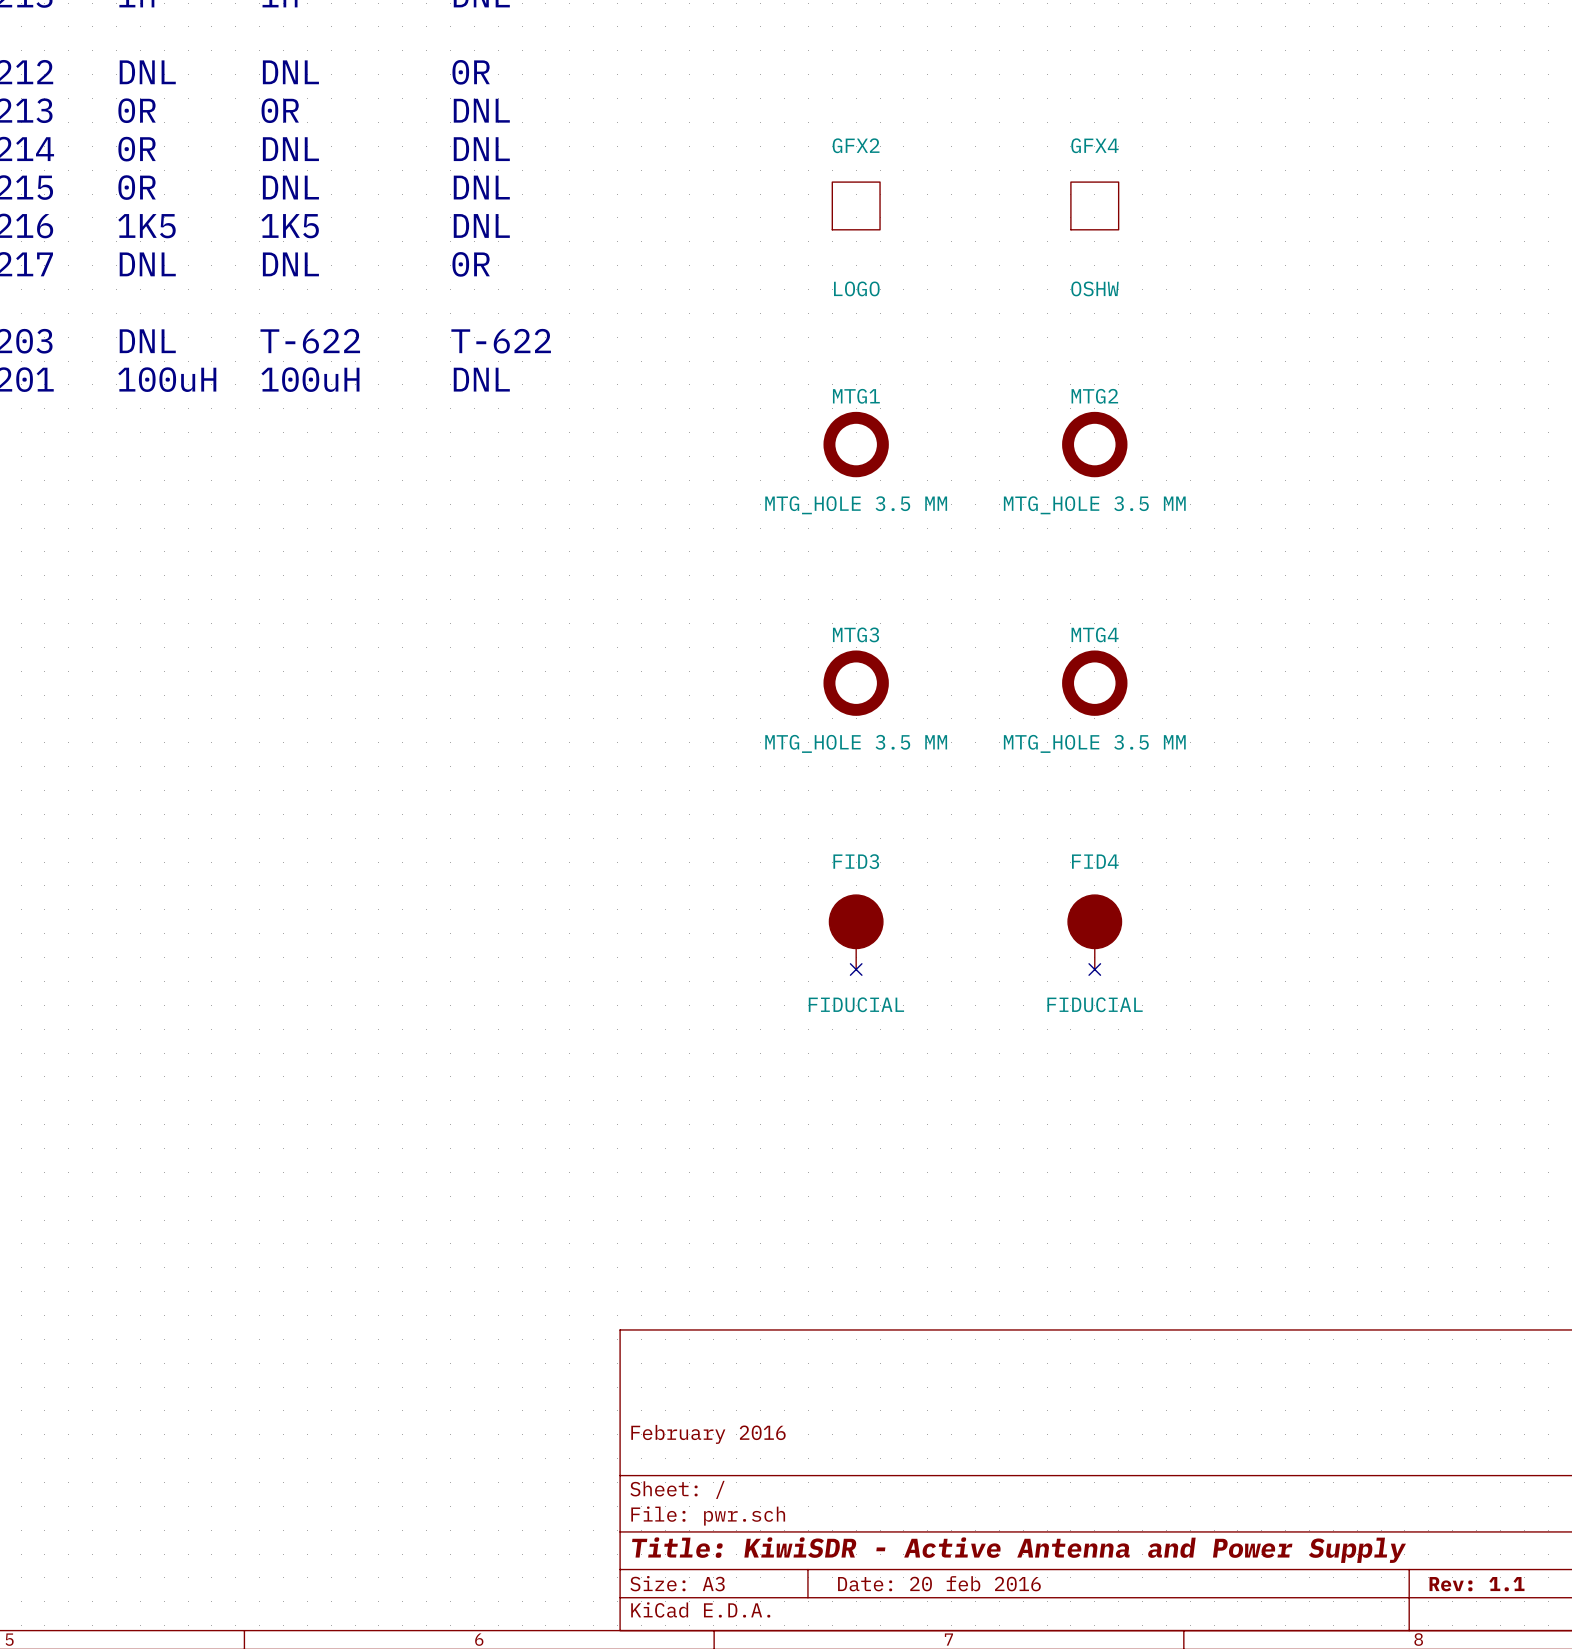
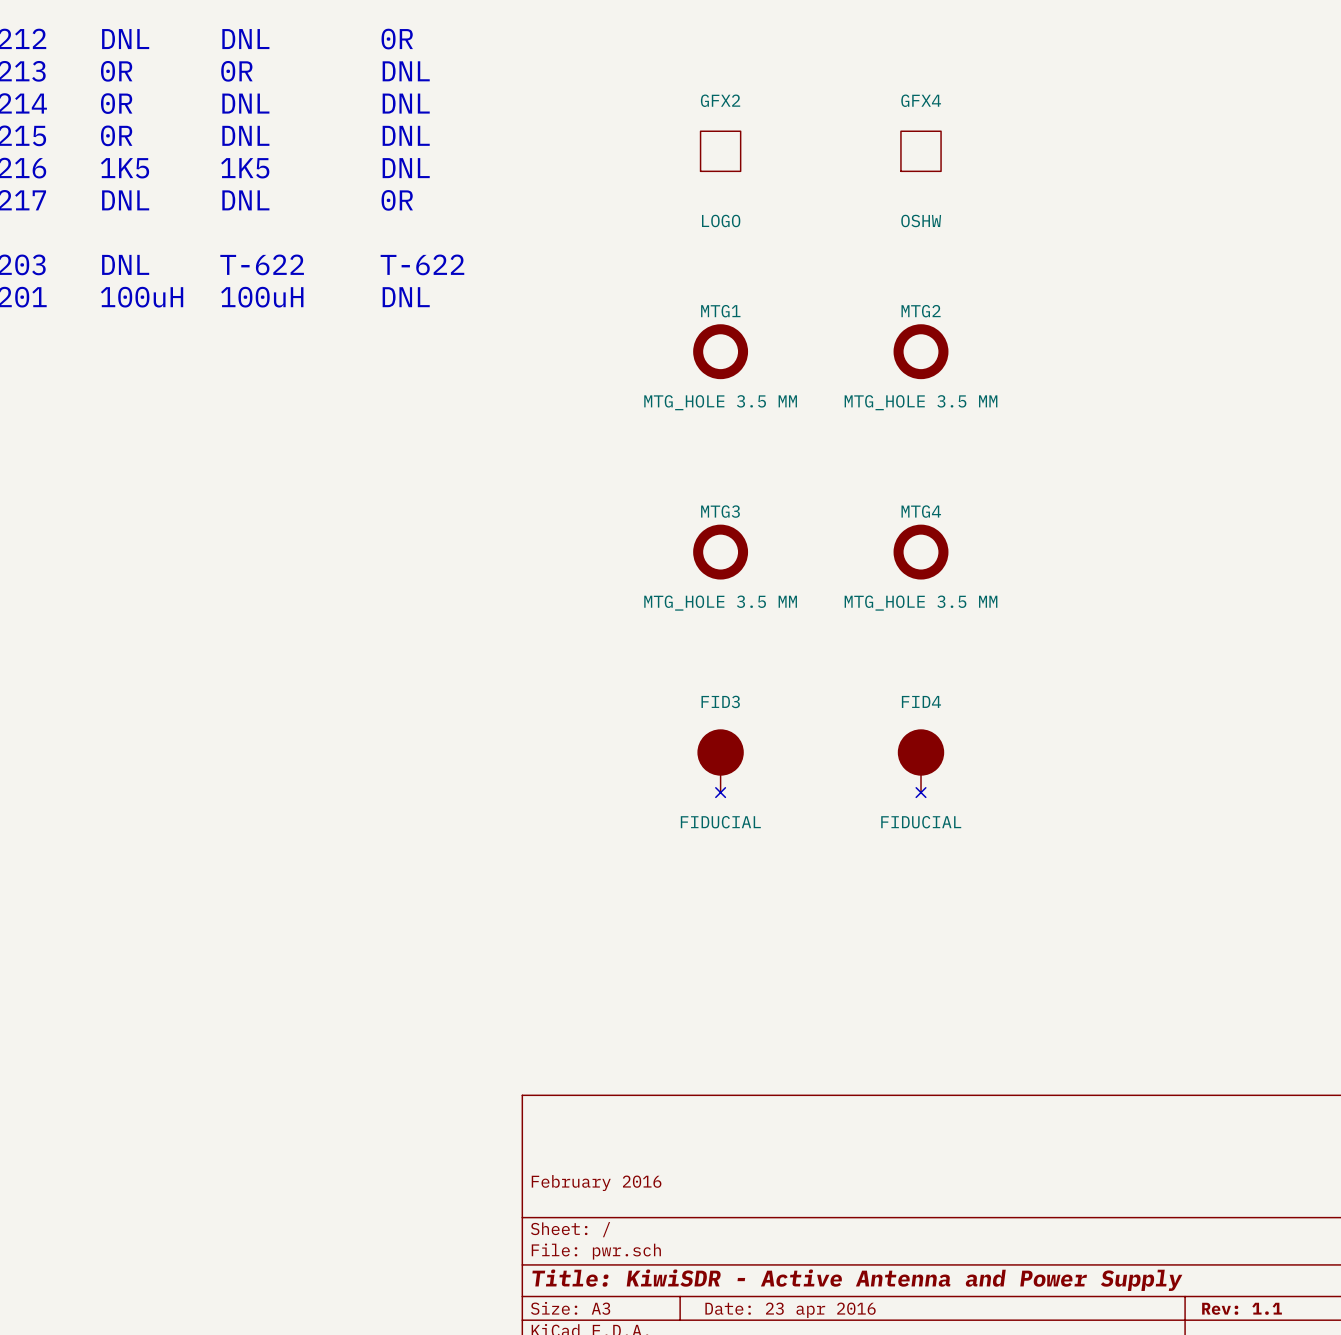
title block: Date: 20 feb 2016 (939, 1583) -> Date: 23 apr 2016 (790, 1310)

